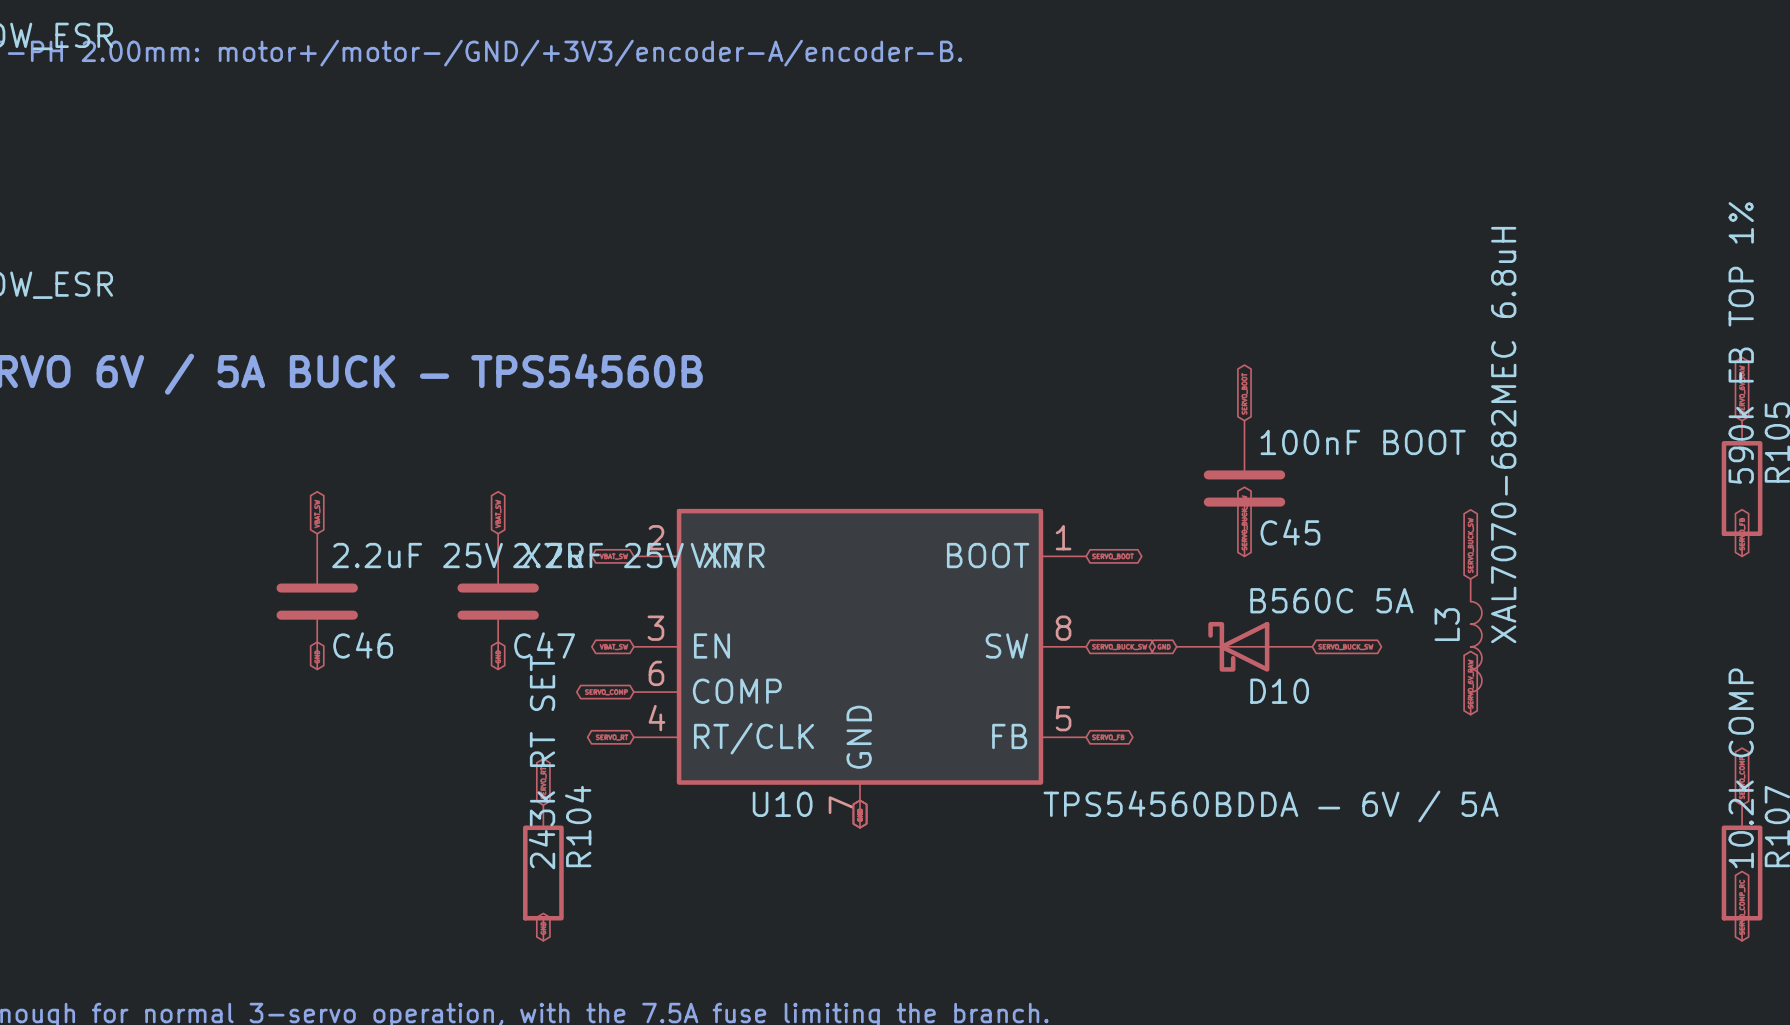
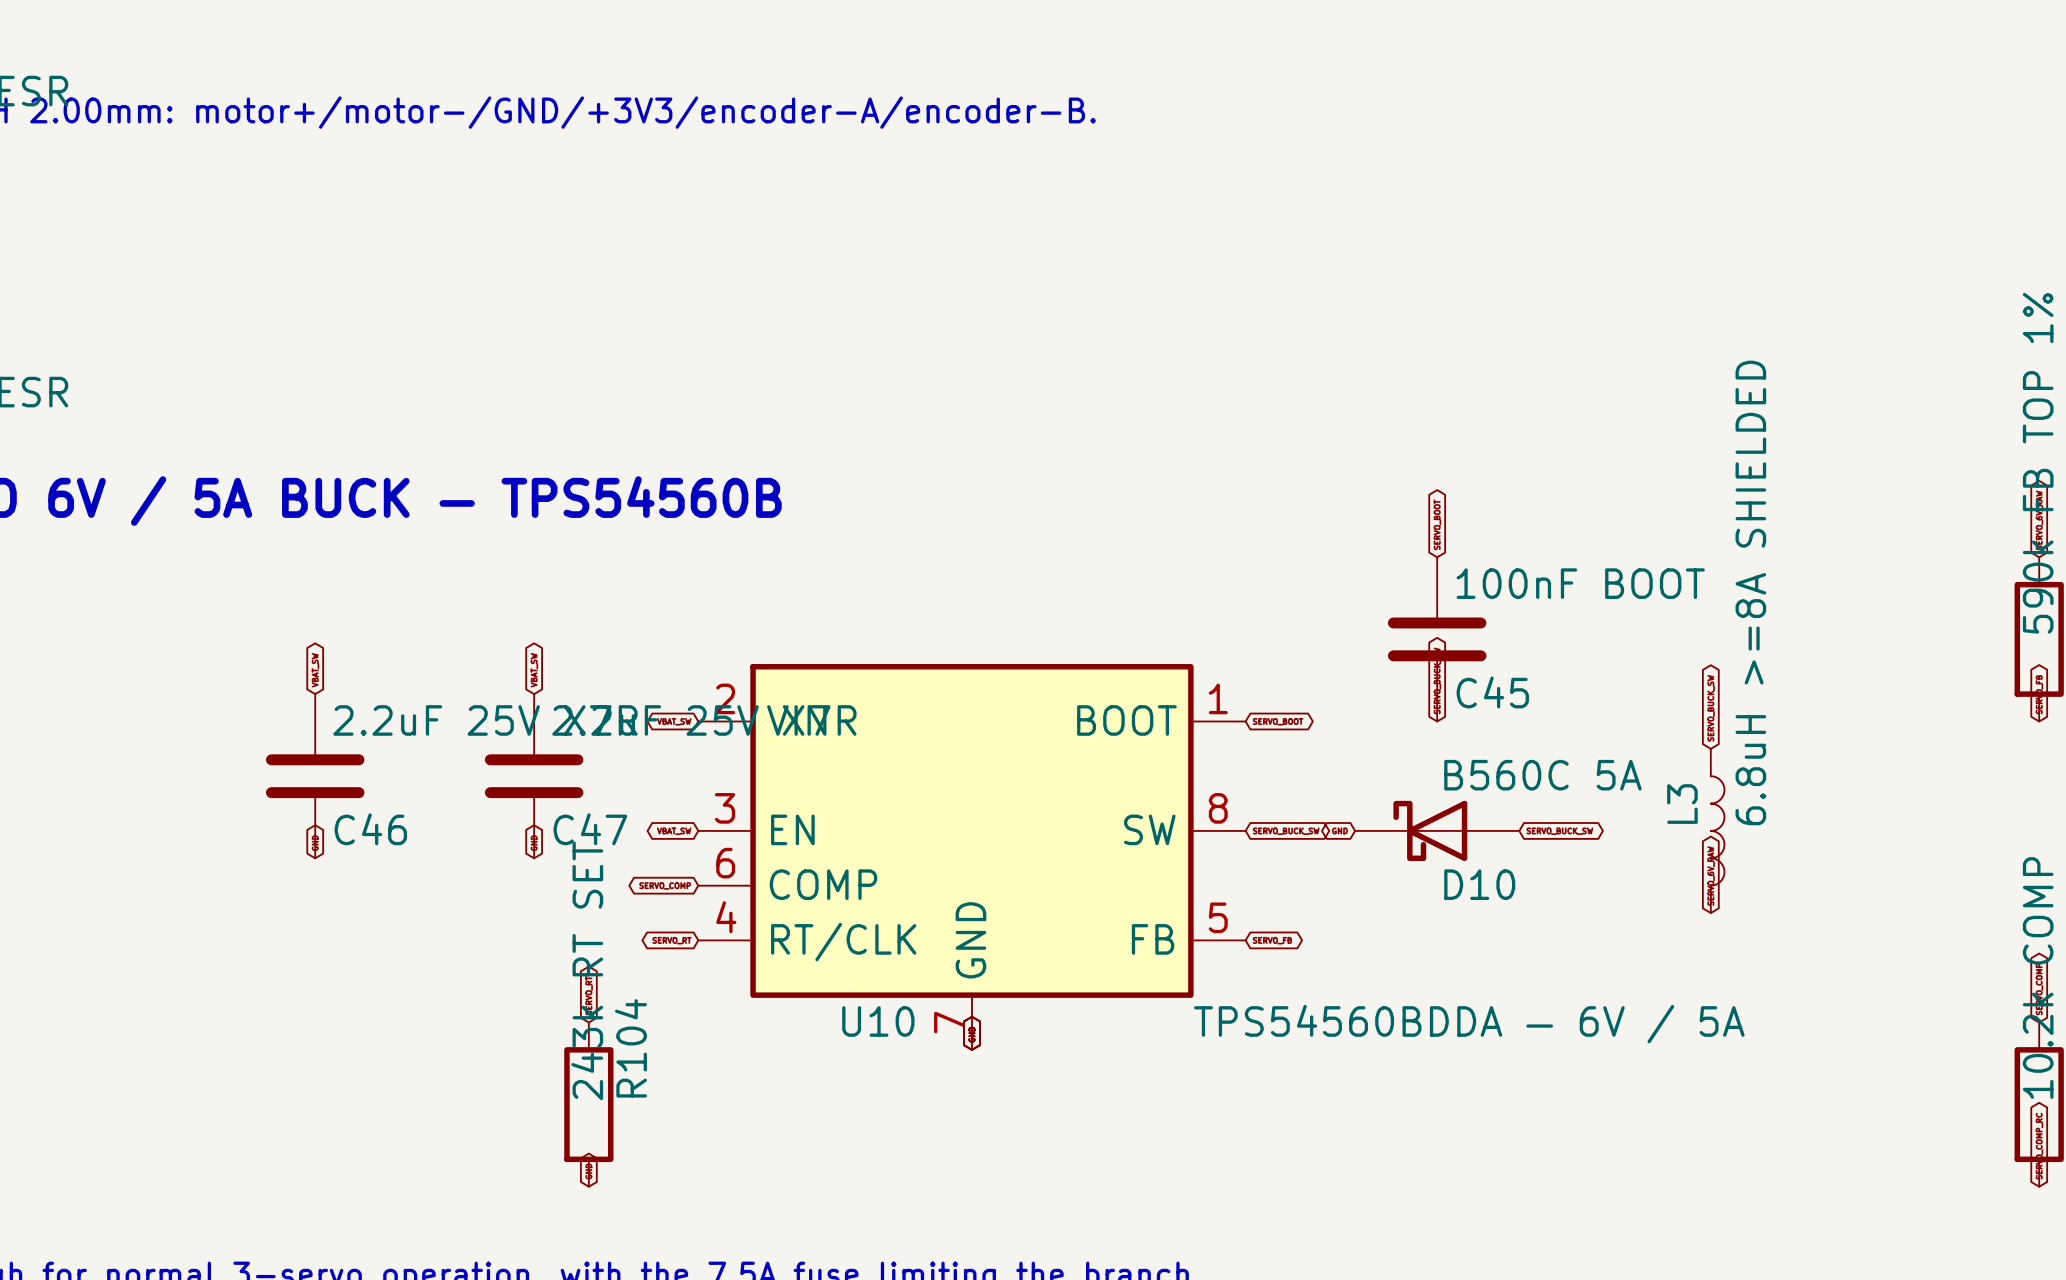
L3 value: XAL7070-682MEC 6.8uH (1503, 435) -> 6.8uH >=8A SHIELDED (1750, 592)

